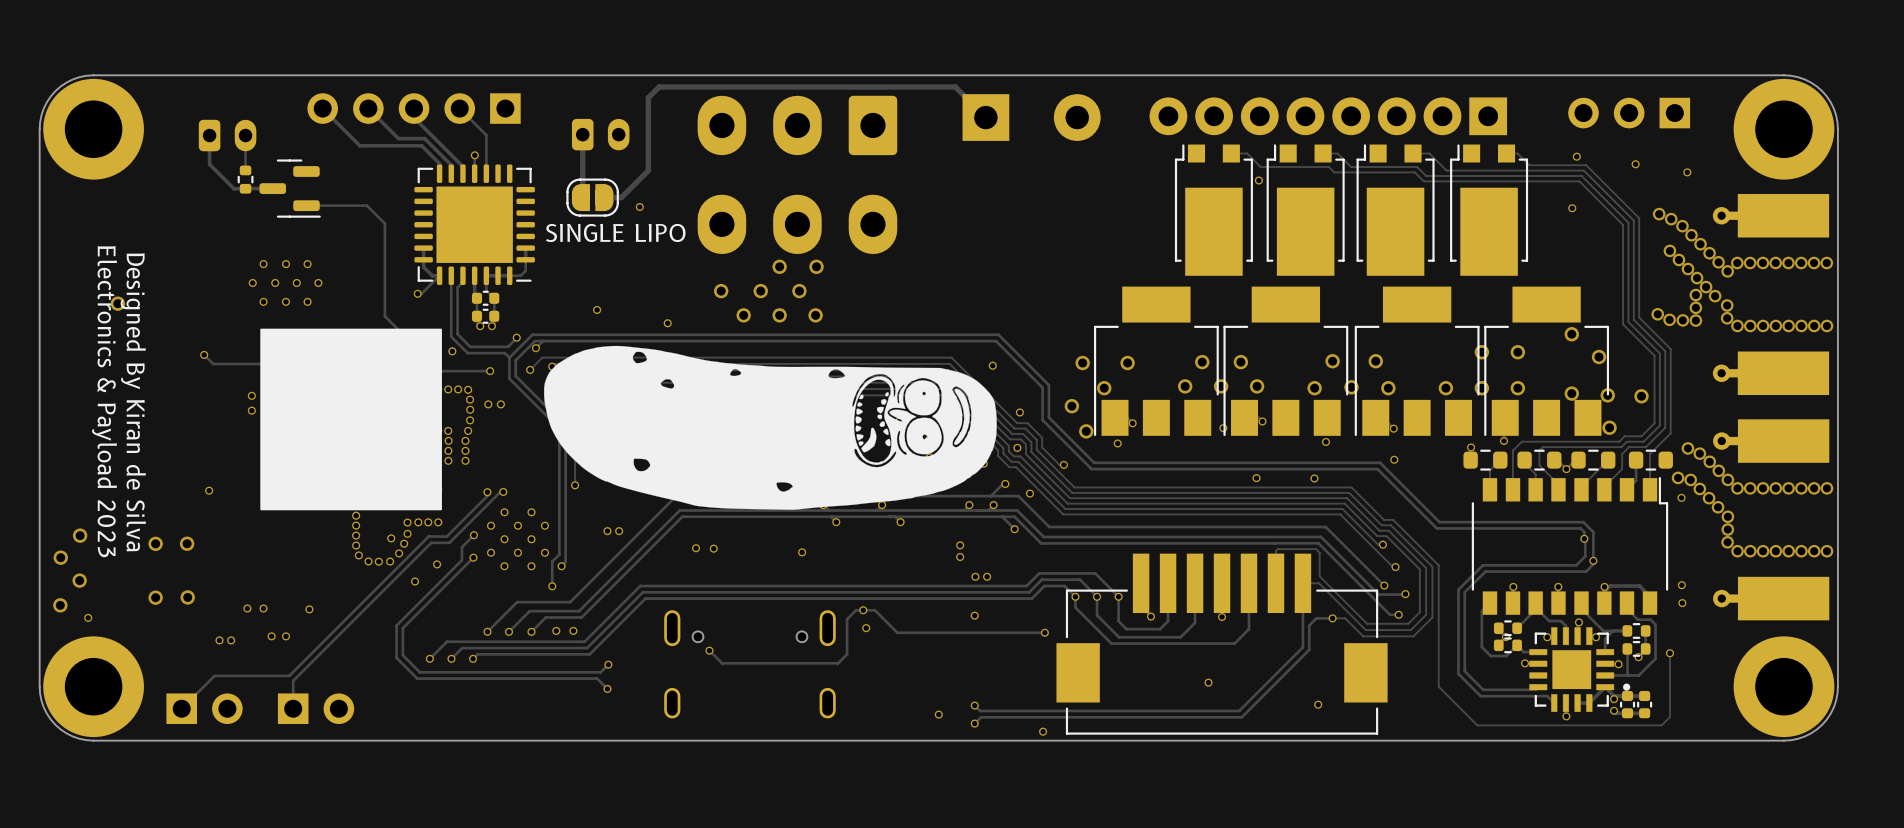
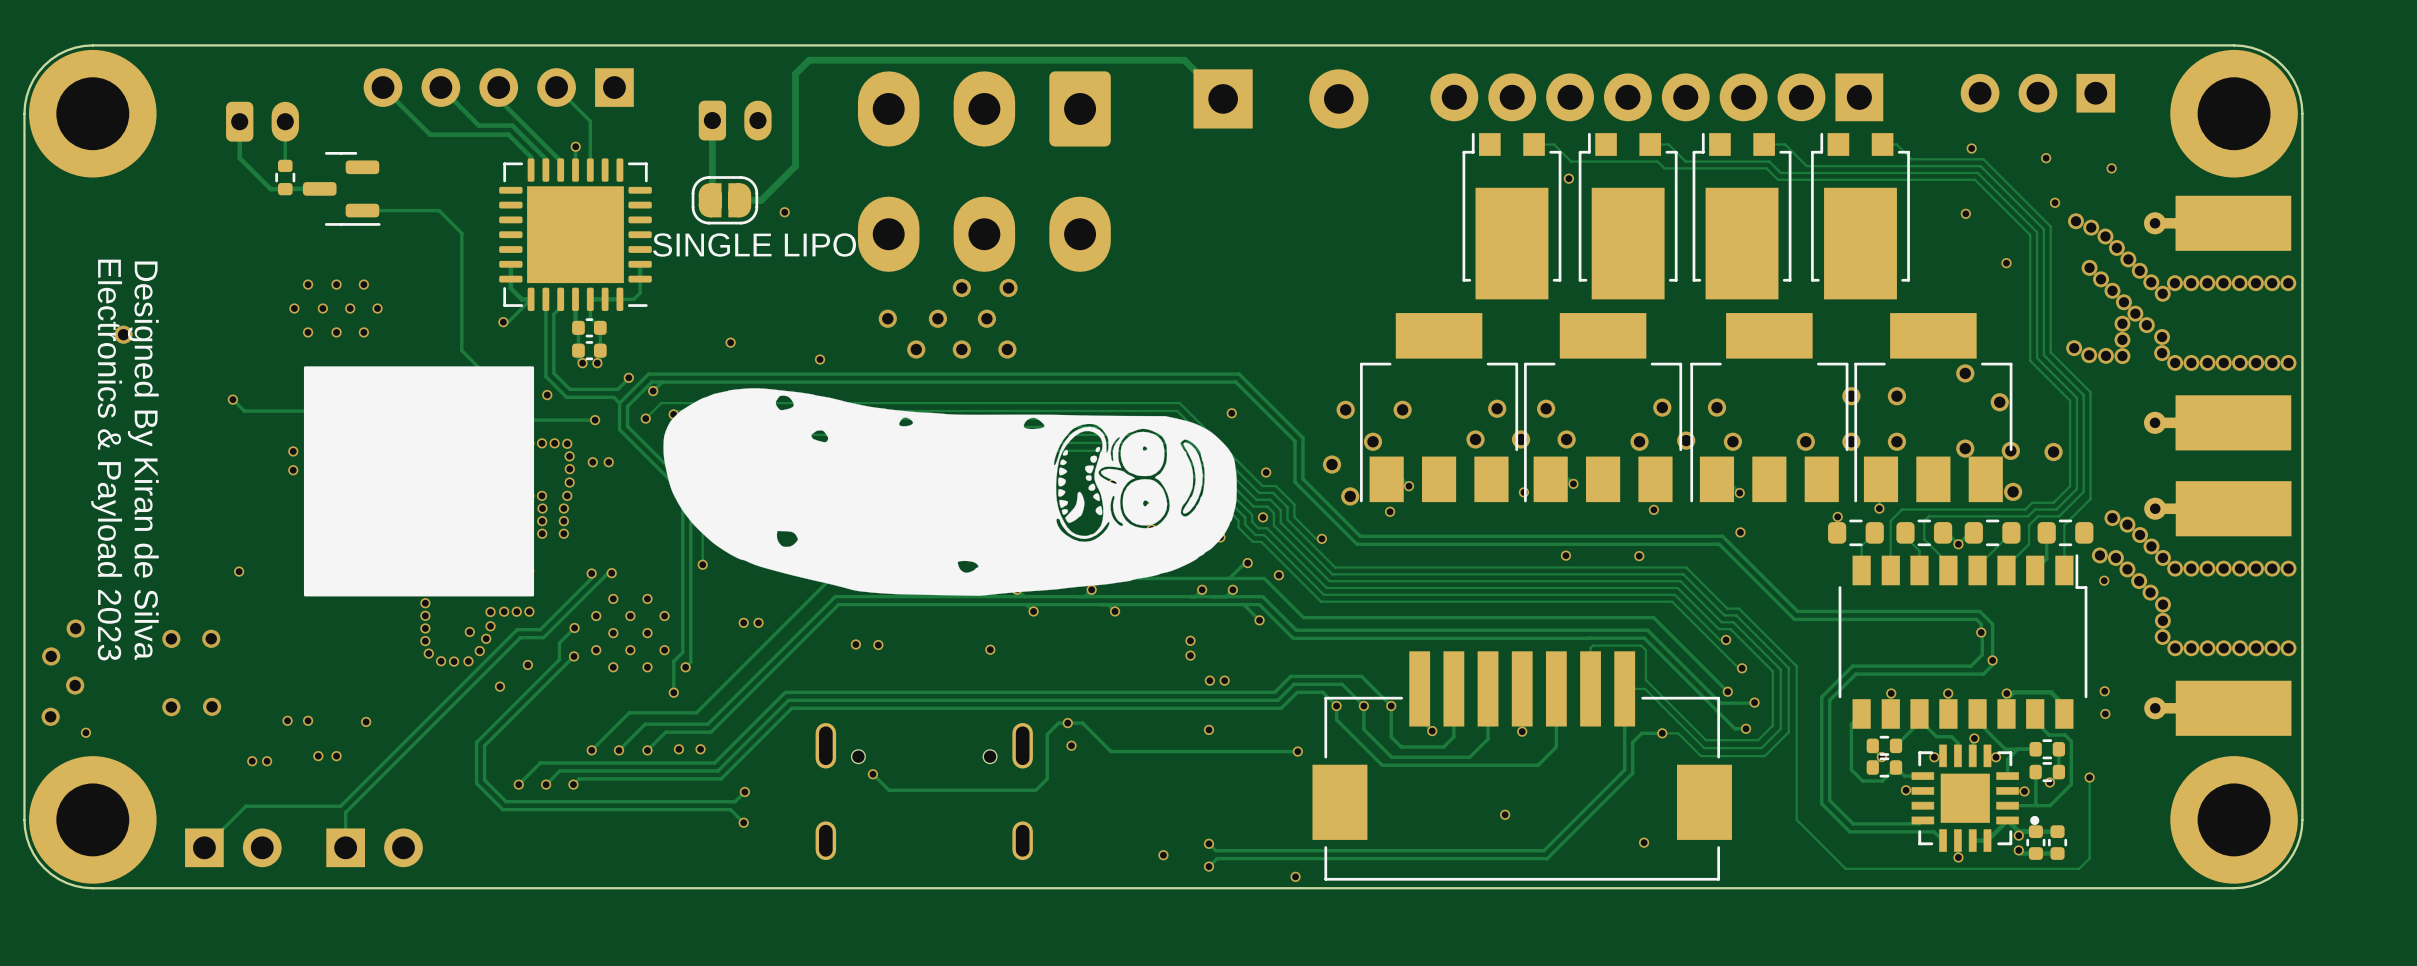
via: none -> (2055, 202)
via: none -> (2006, 263)

